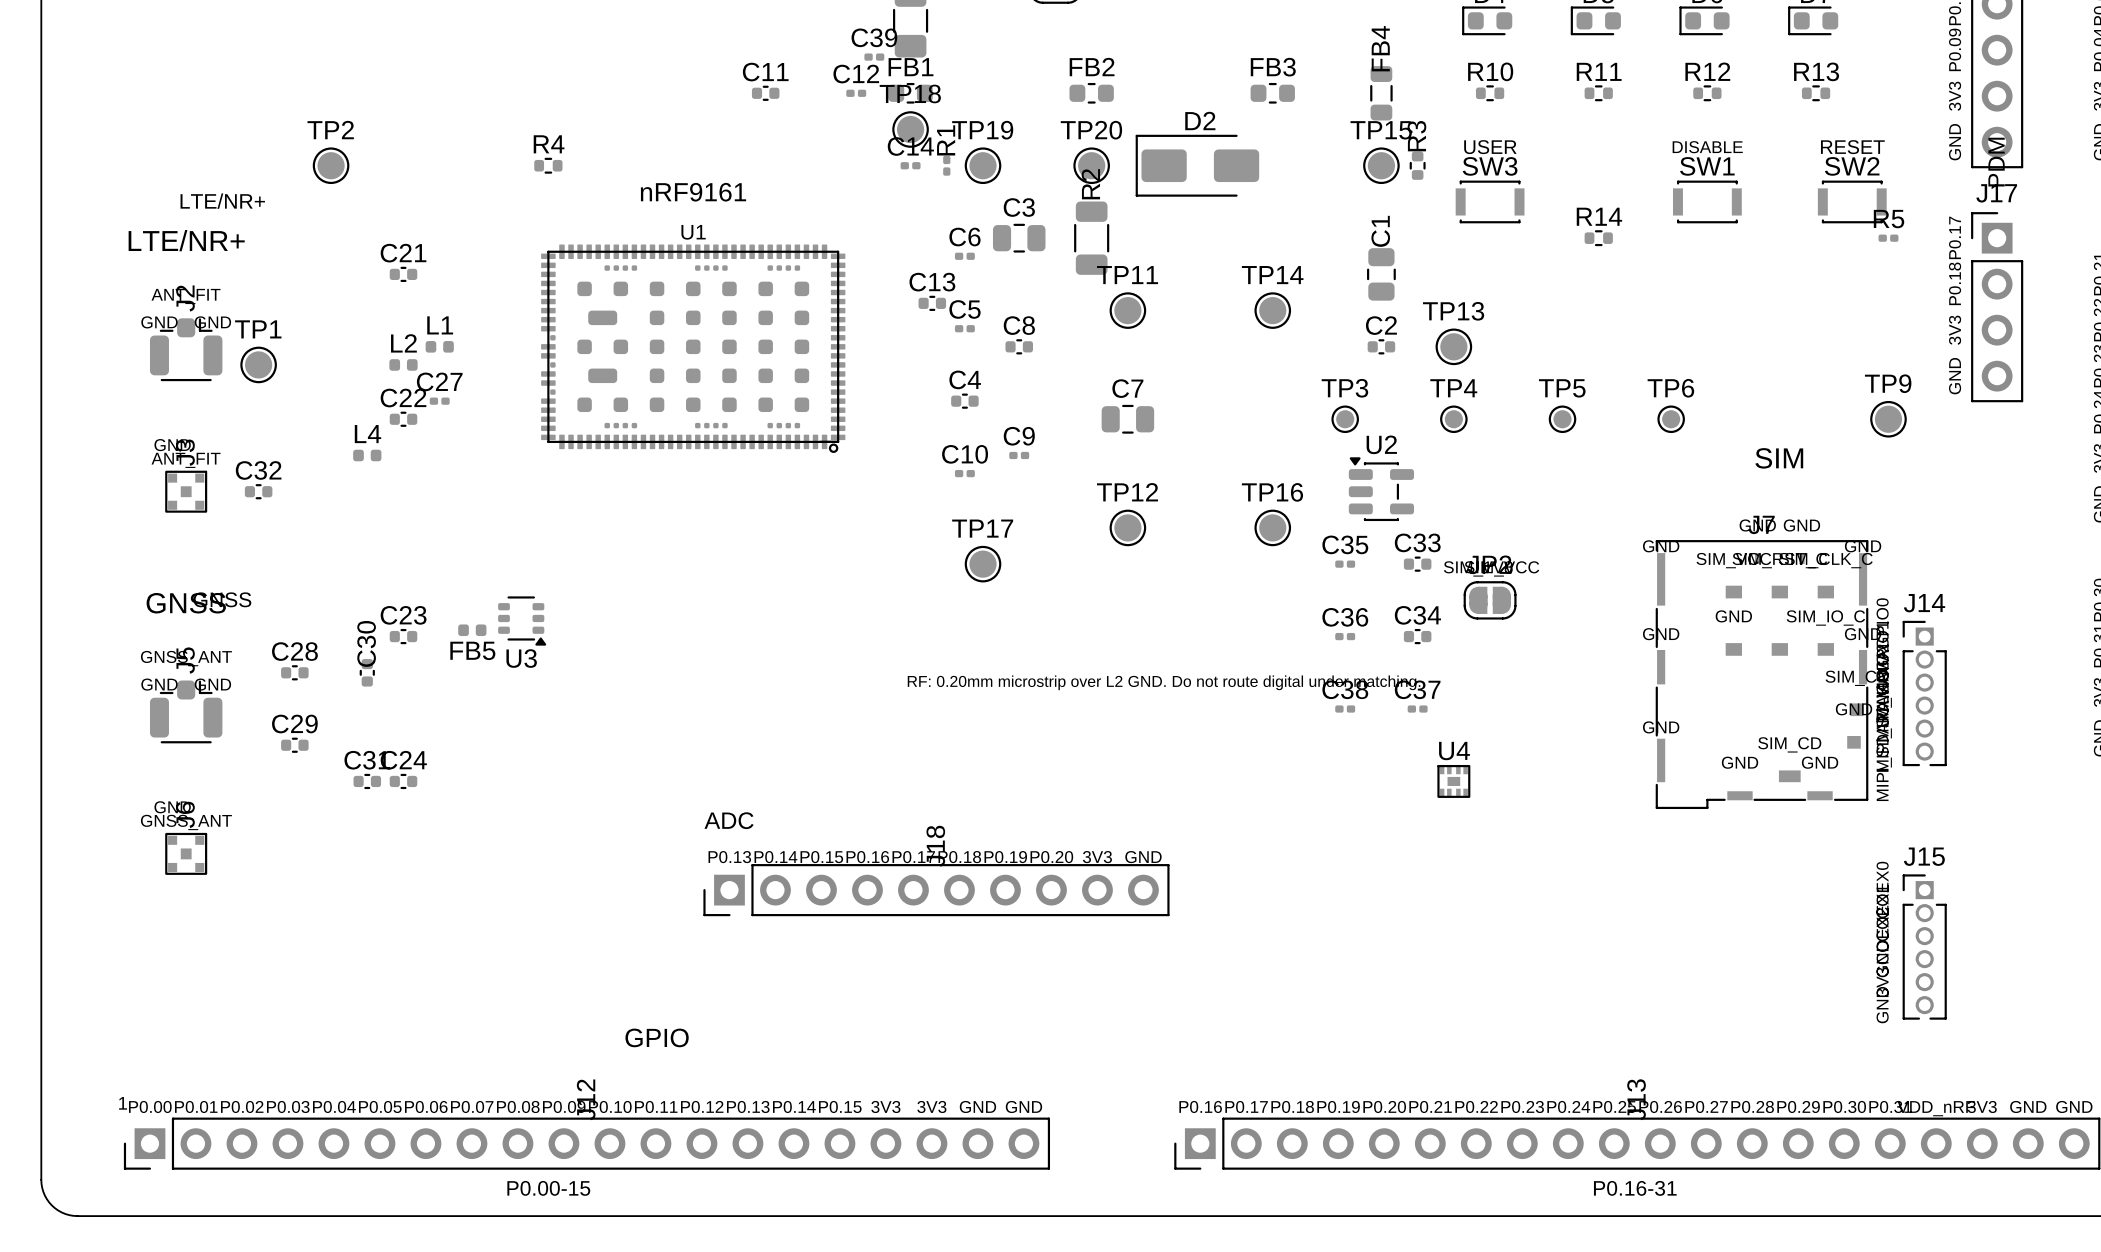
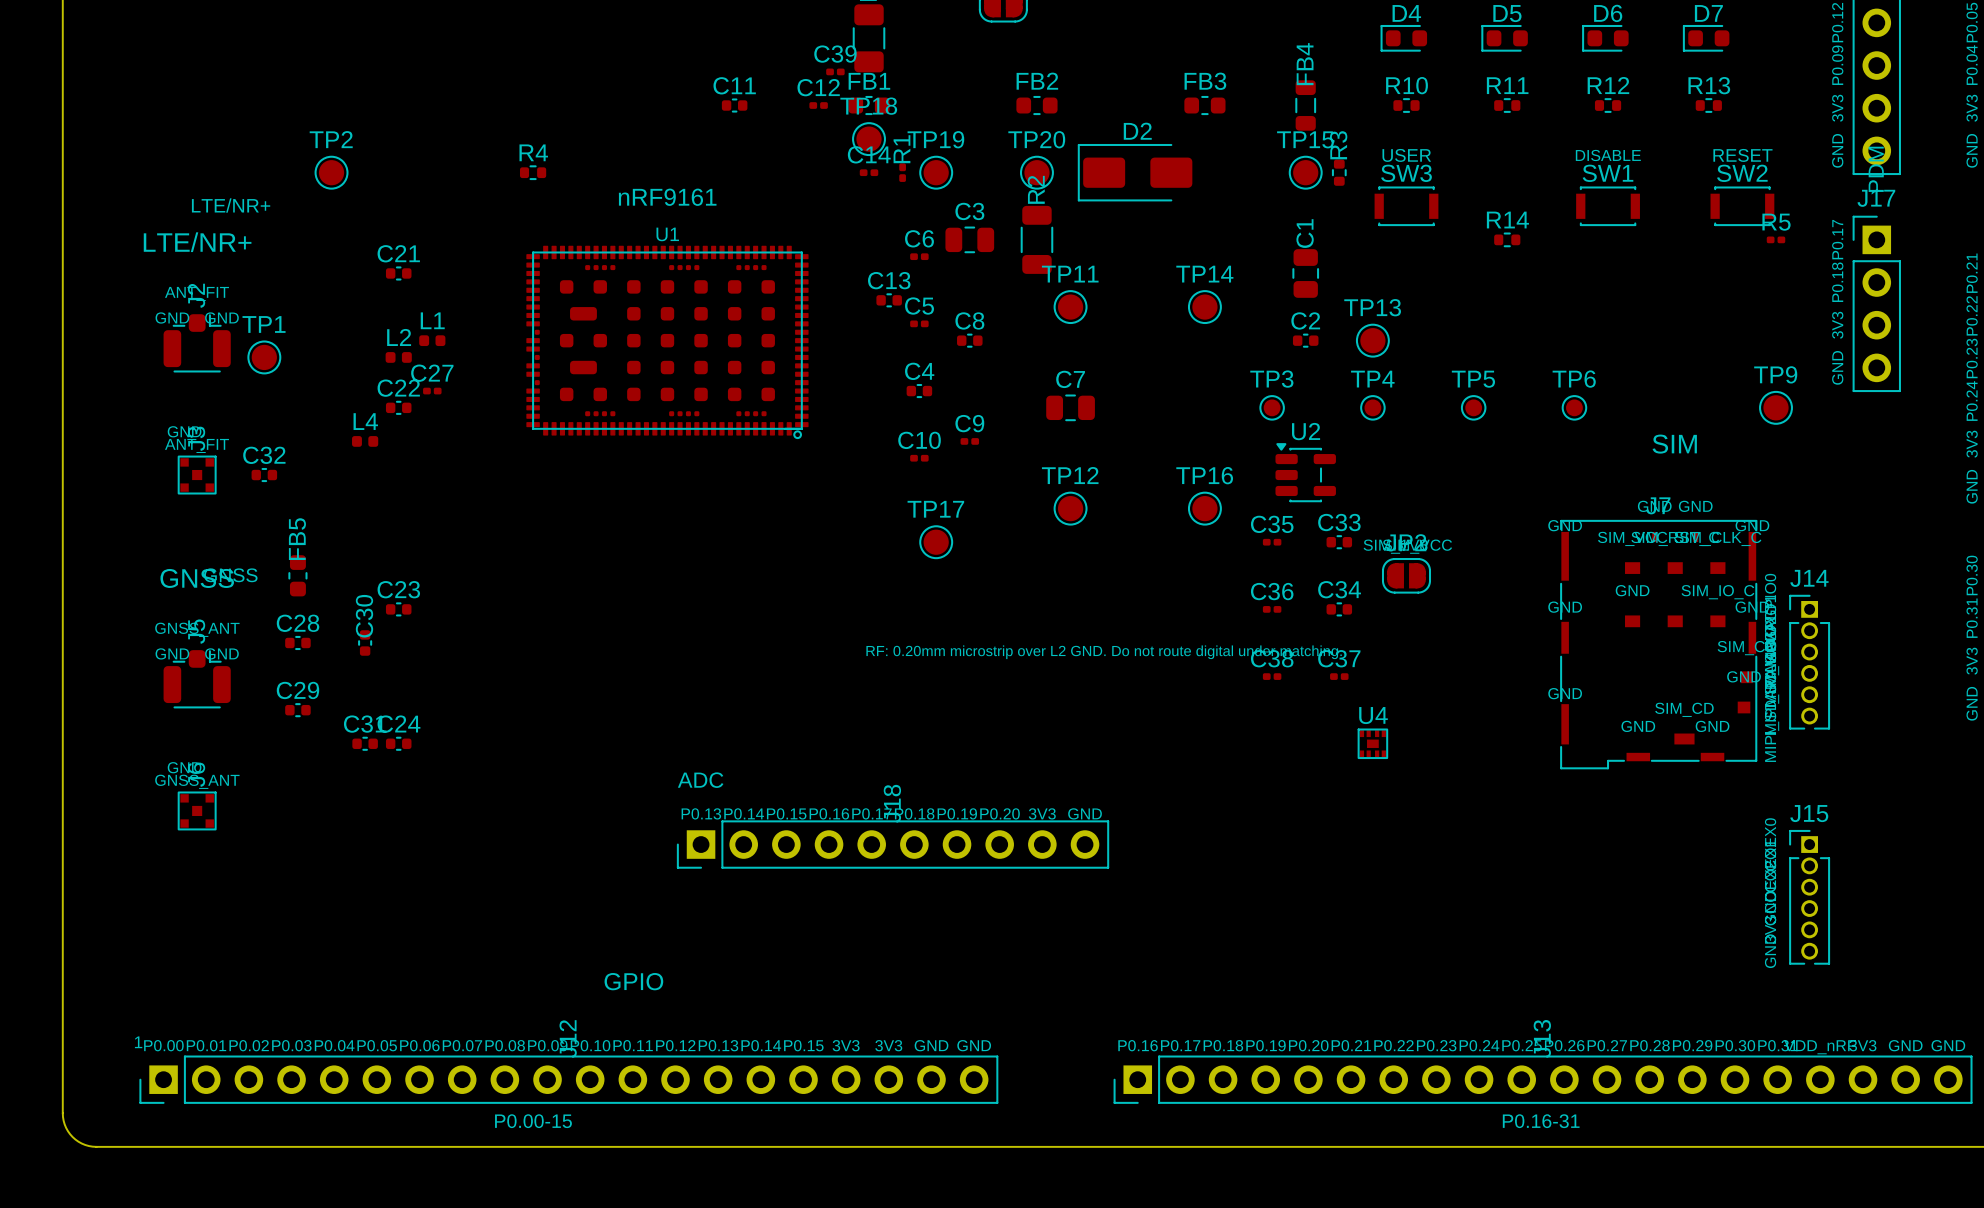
U3: (522, 621) -> none
FB5 footprint: [458, 624, 487, 637] -> [288, 555, 308, 597]
FB5 name position: FB5 (472, 650) -> FB5 (297, 539)

